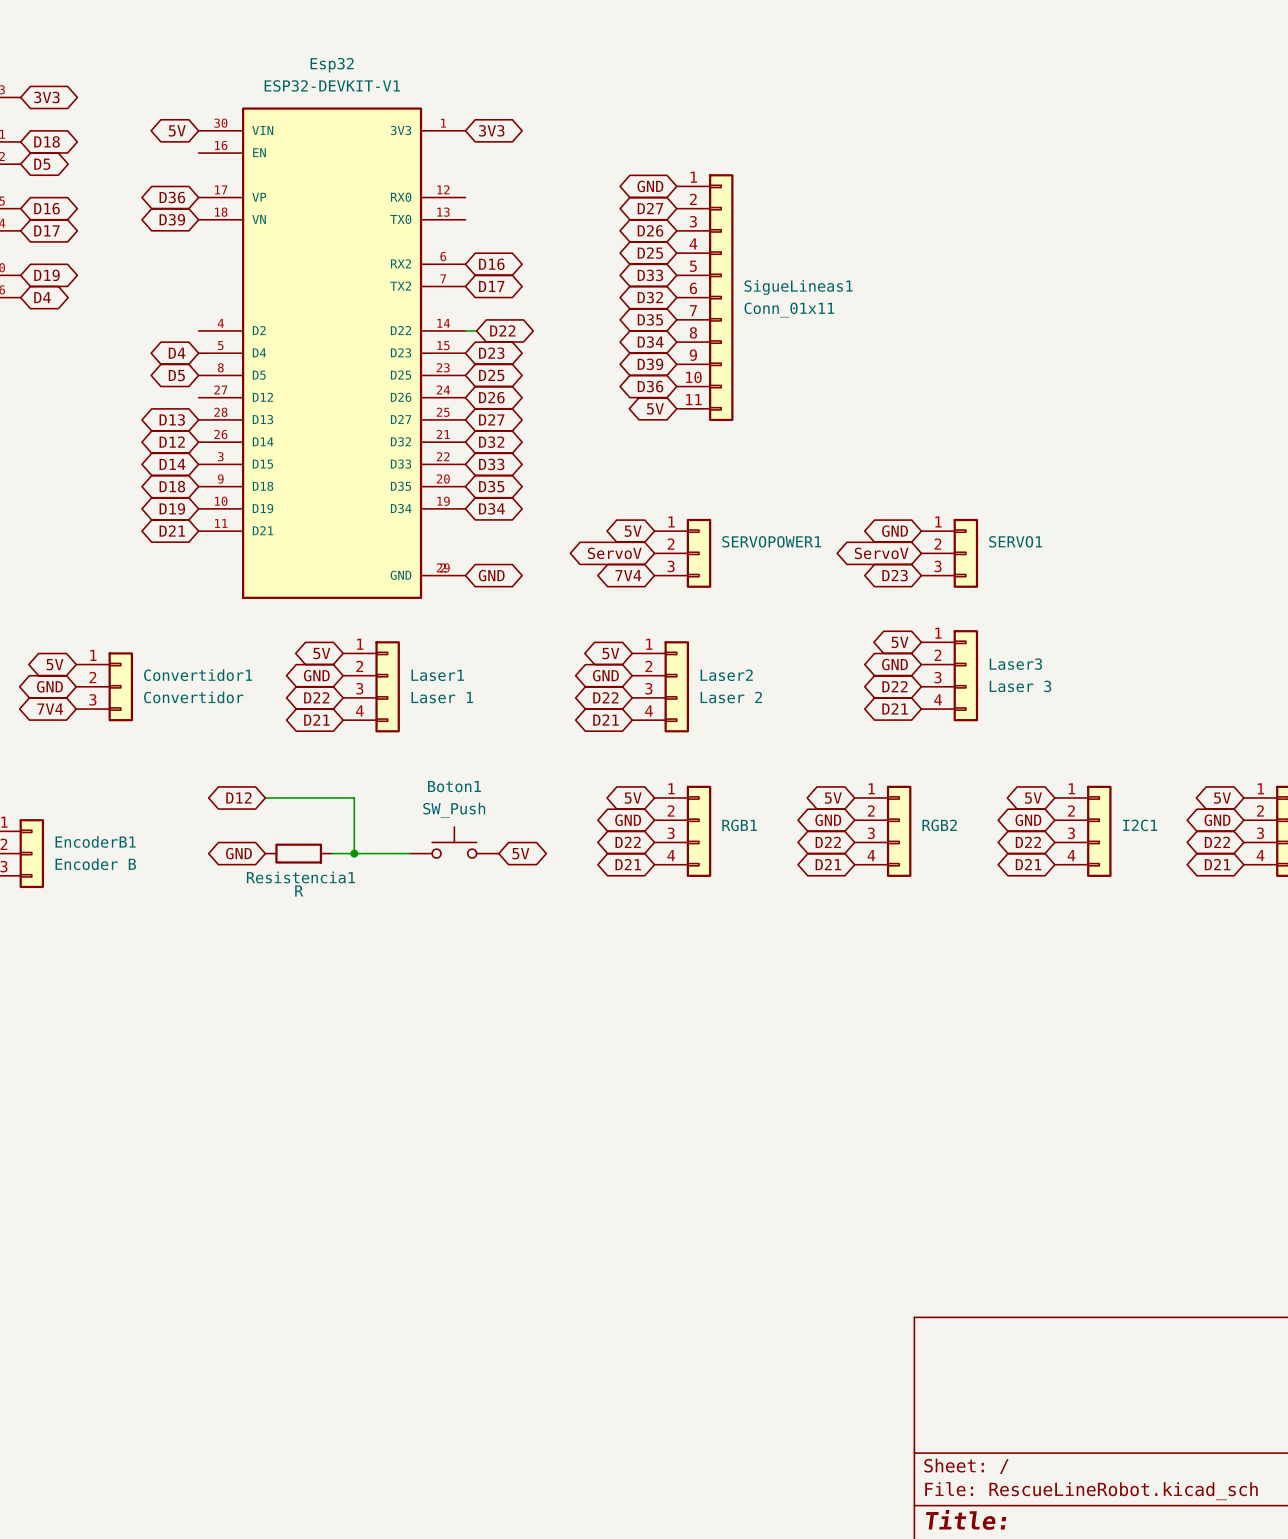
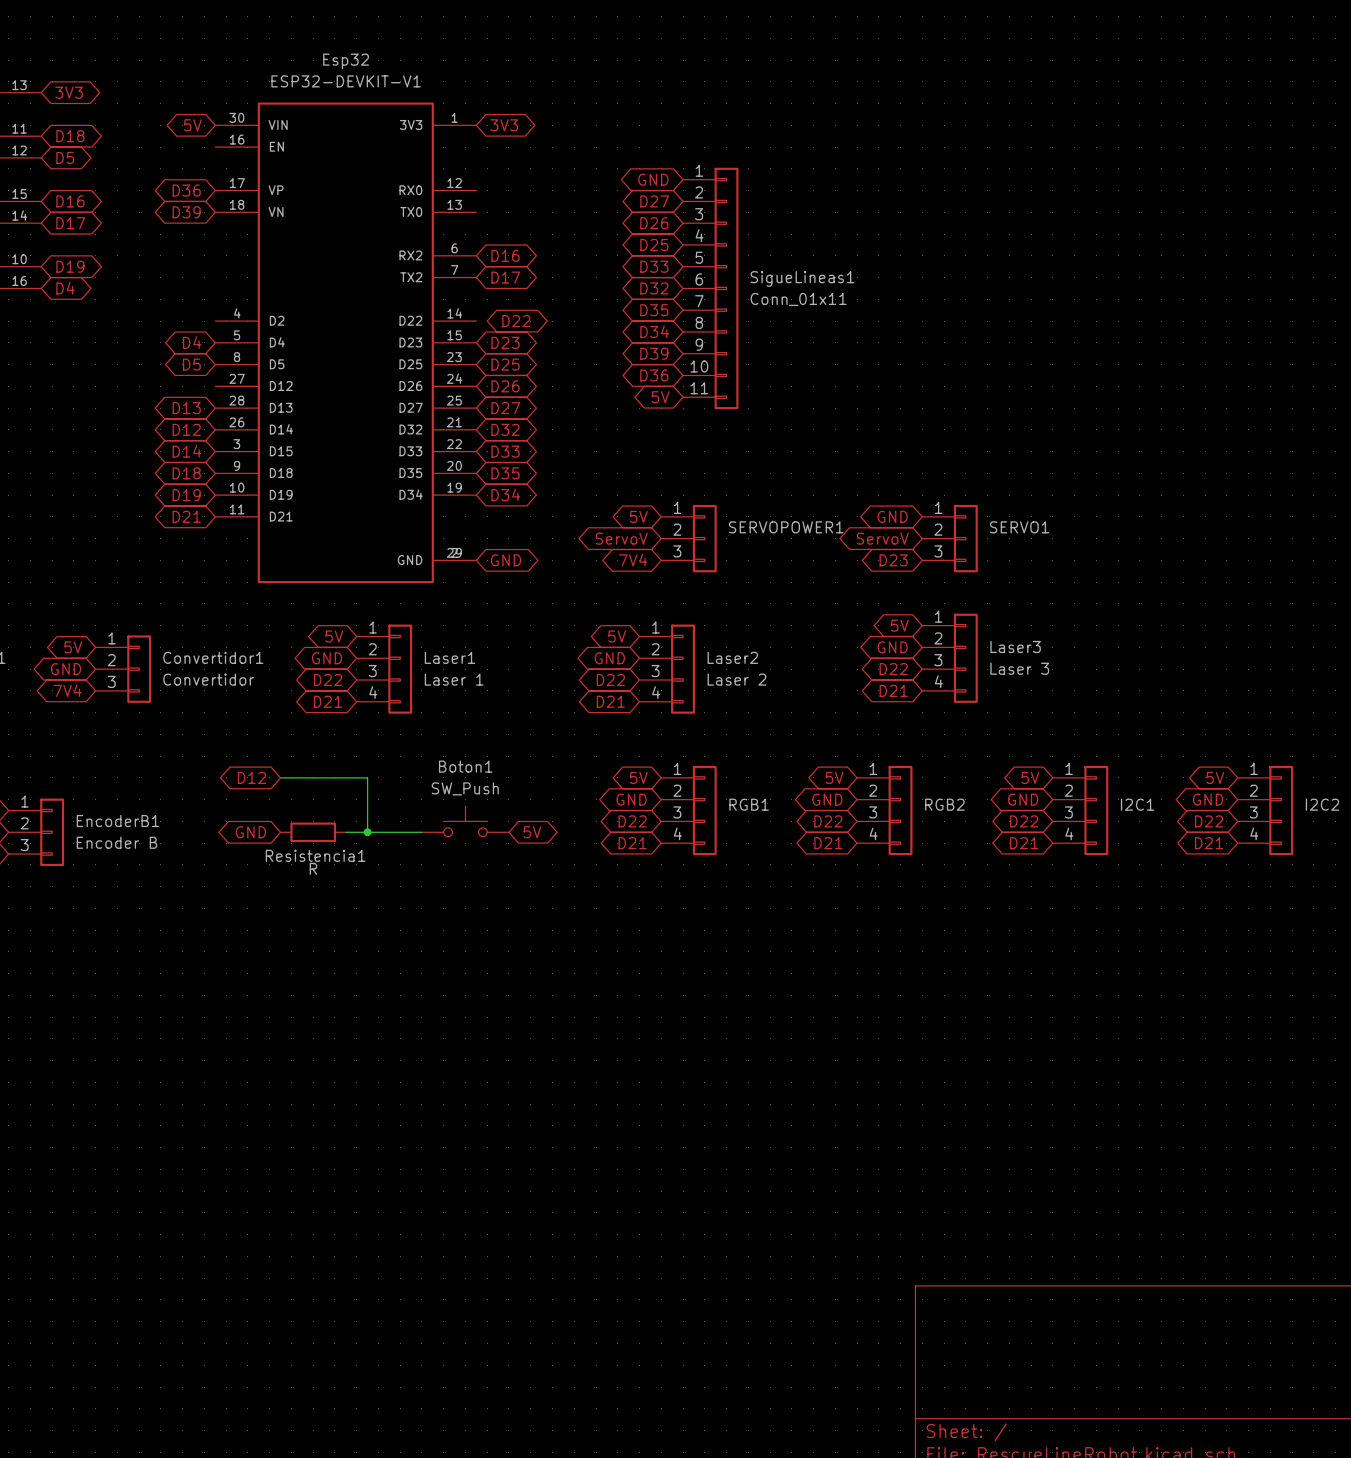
wire: (465, 330) (476, 330) -> none

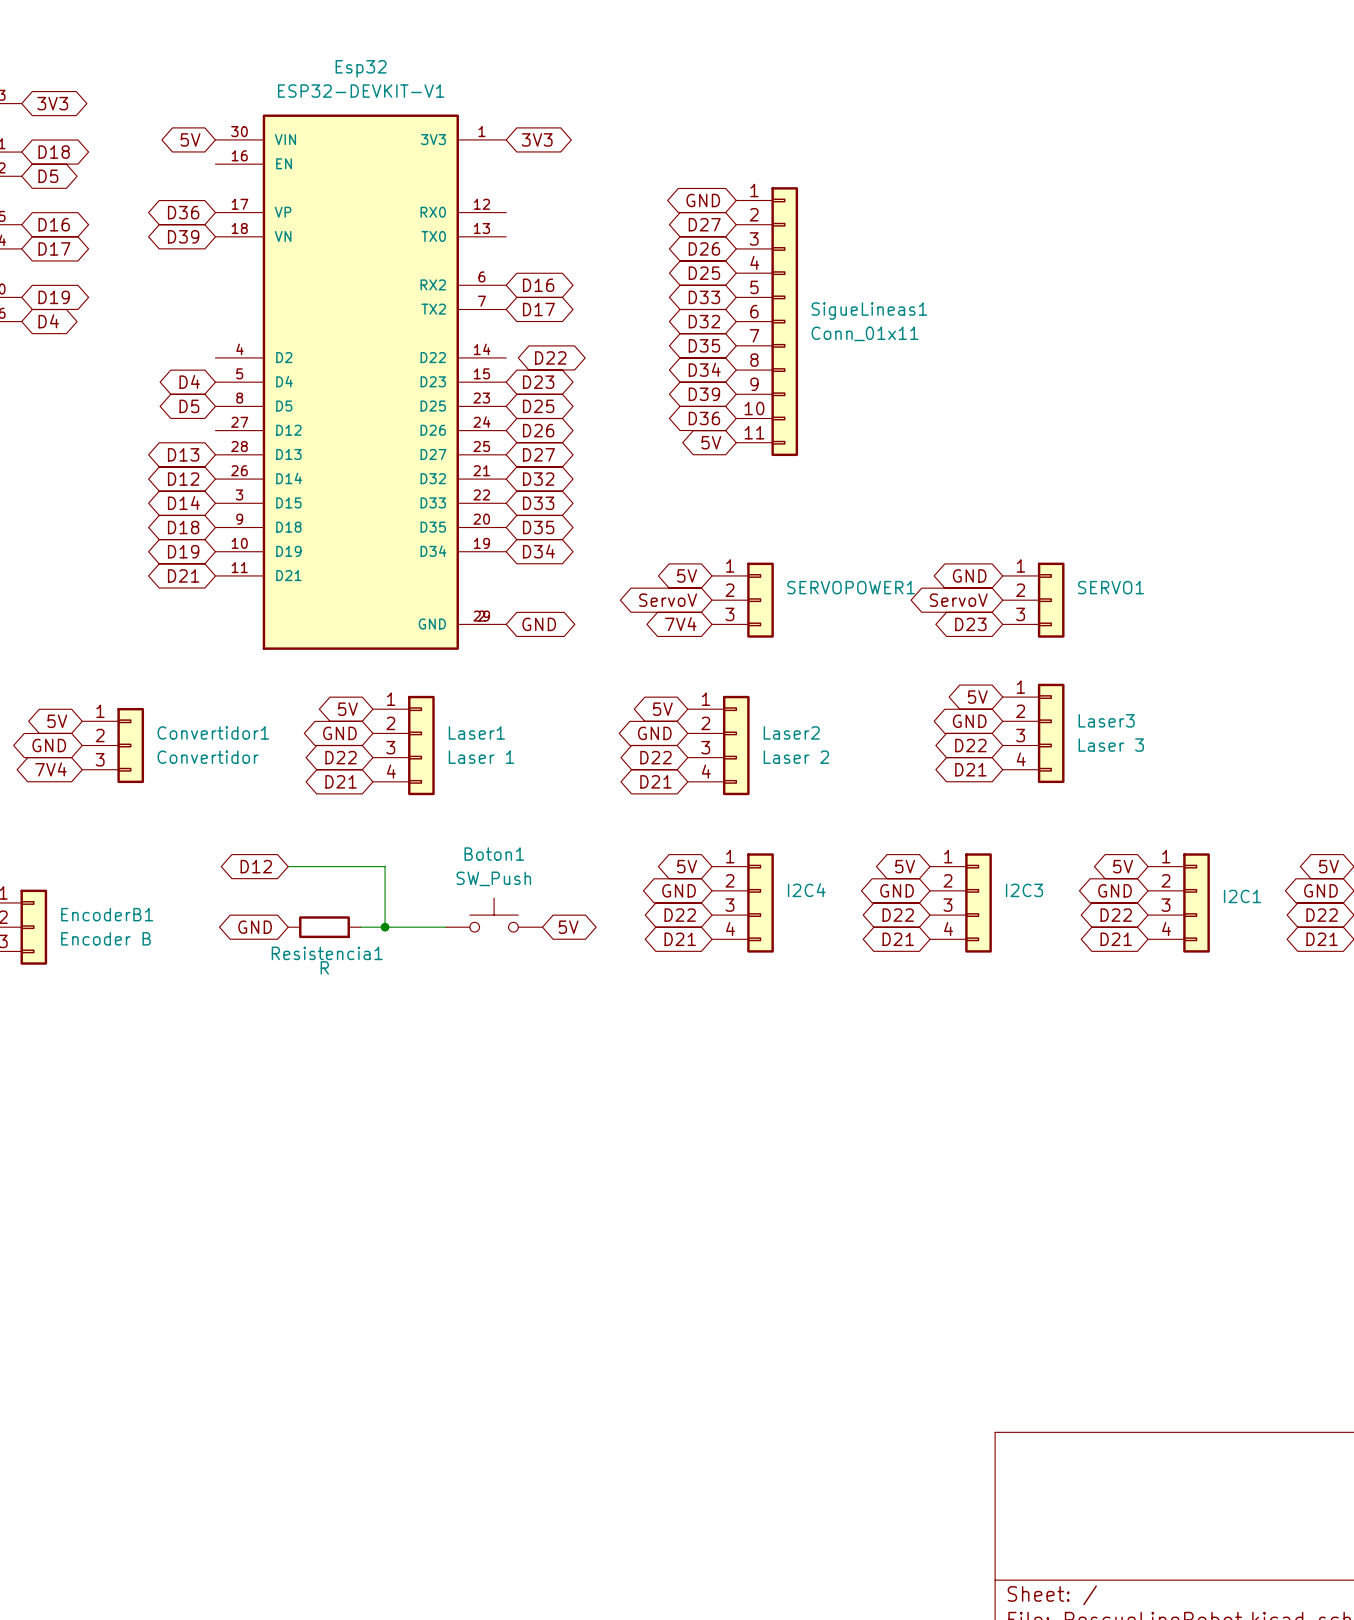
RGB1 name: RGB1 (749, 804) -> I2C4 (806, 890)
RGB2 name: RGB2 (944, 804) -> I2C3 (1024, 890)

